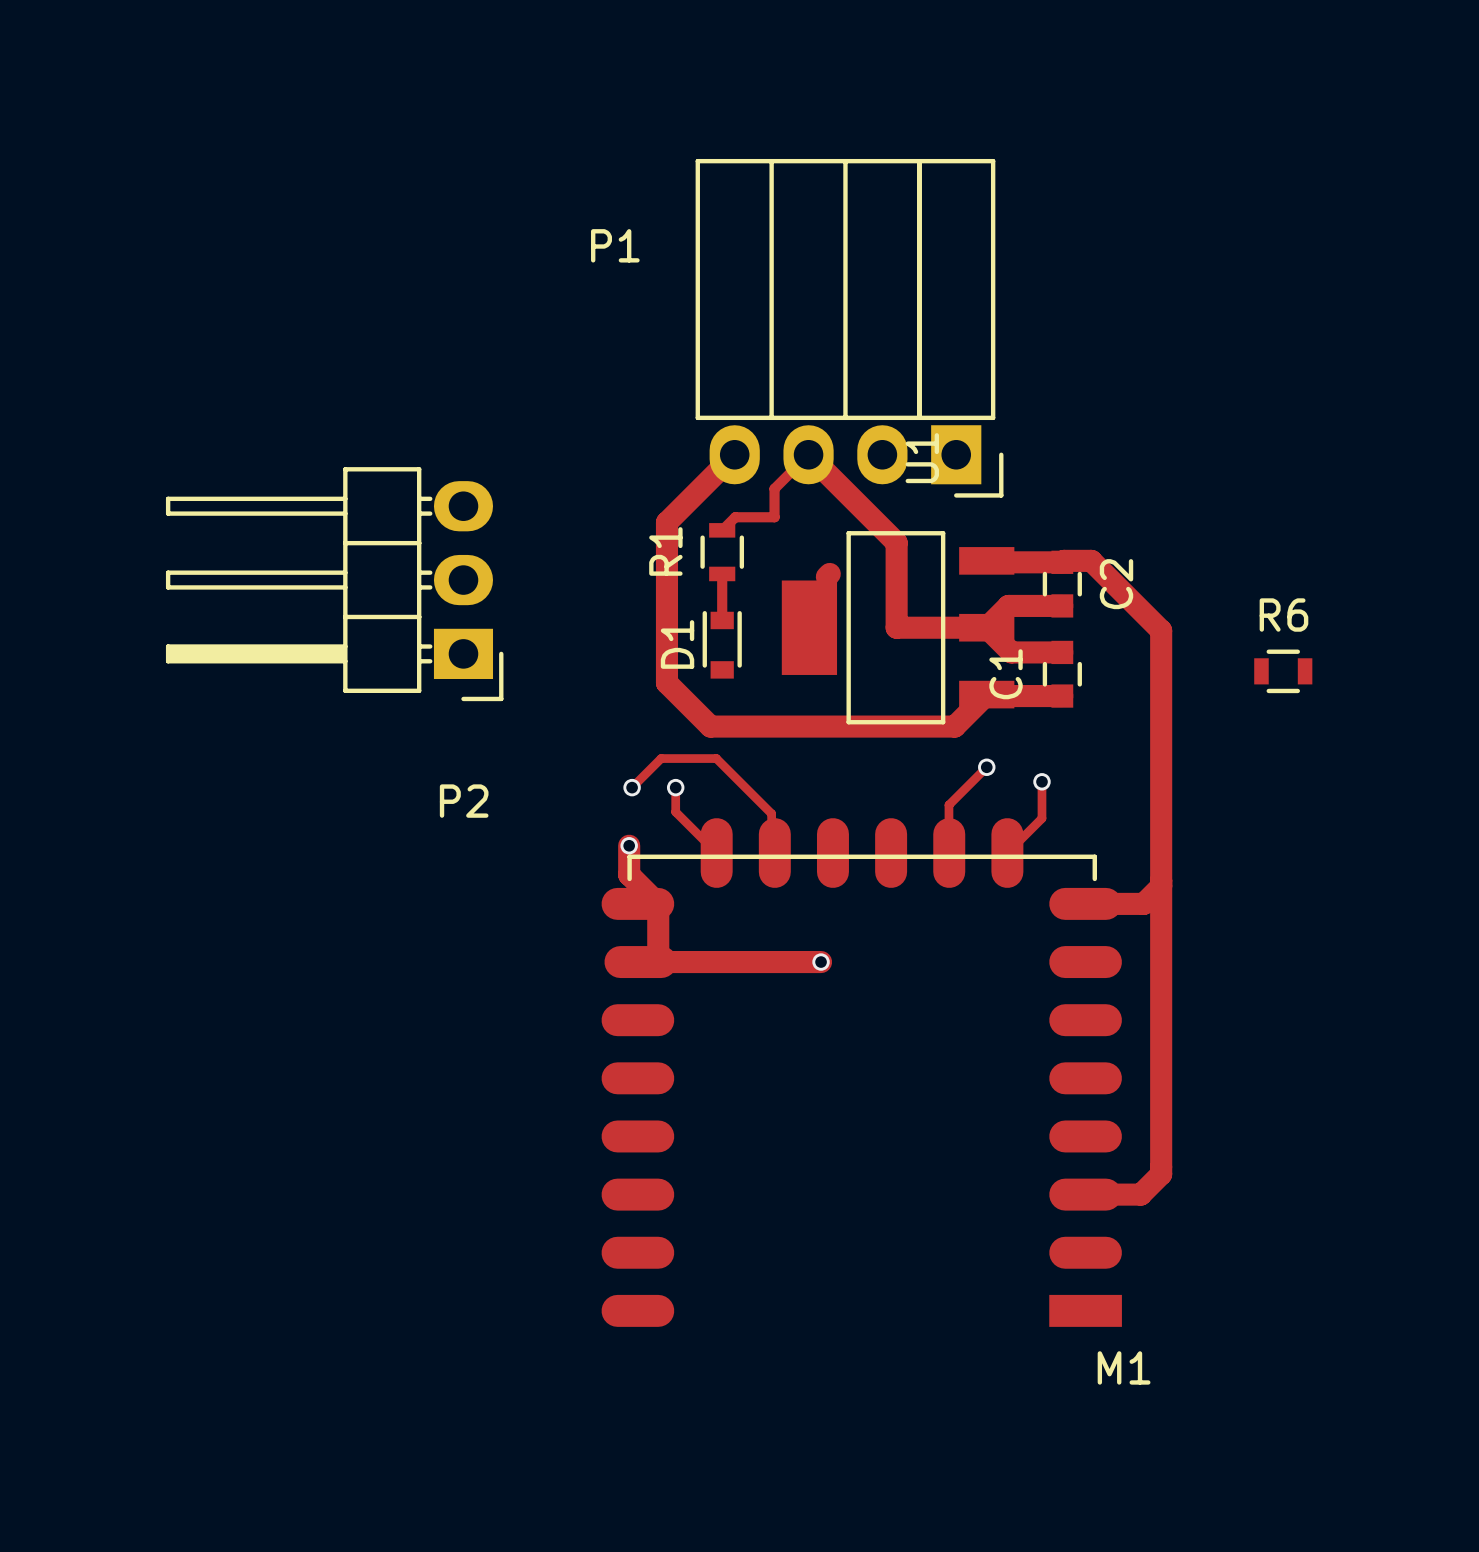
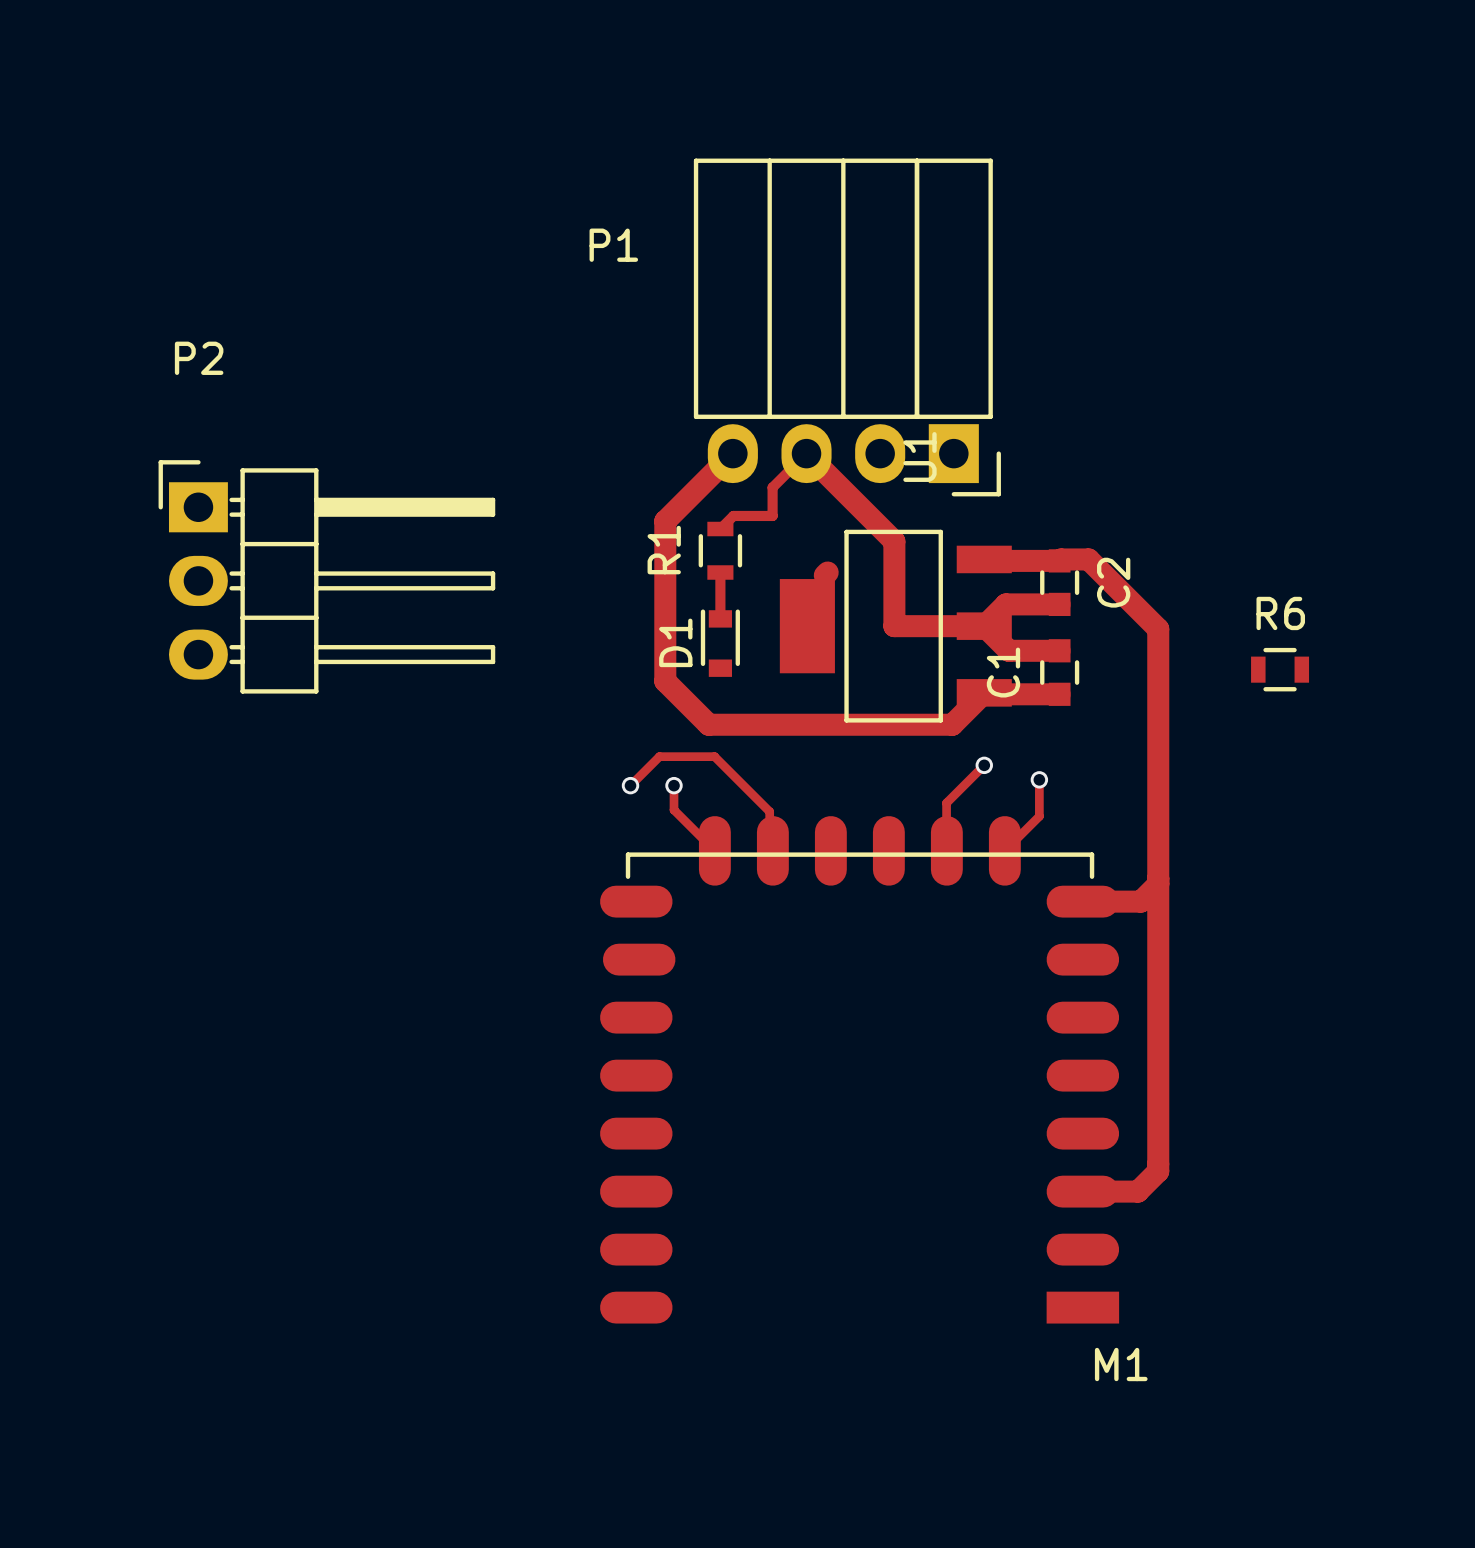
P2 rotation: 0° (334, 584) -> 180° (326, 576)
track: (629, 845) (629, 874) (658, 903) (658, 962) (821, 962) -> none
via: (629, 845) -> none
via: (821, 962) -> none

